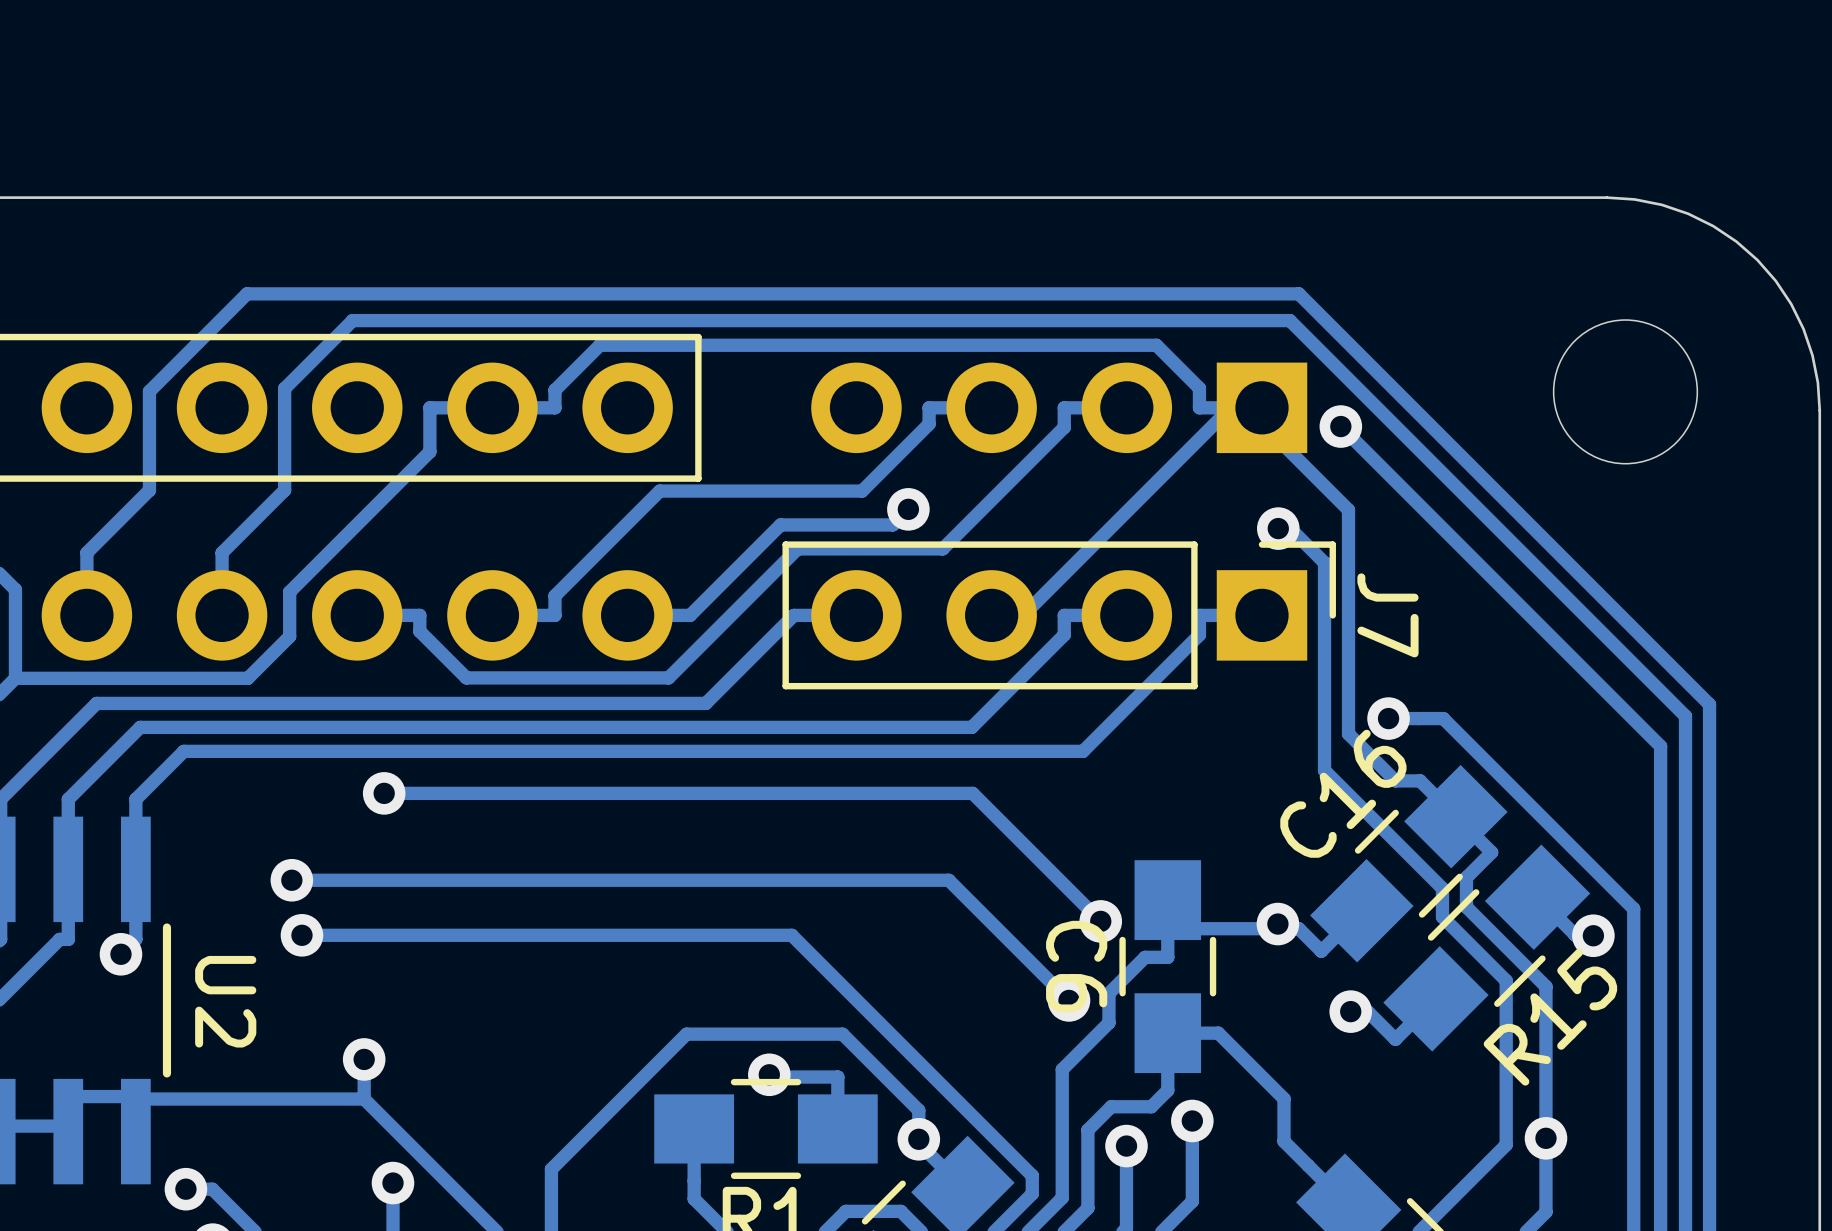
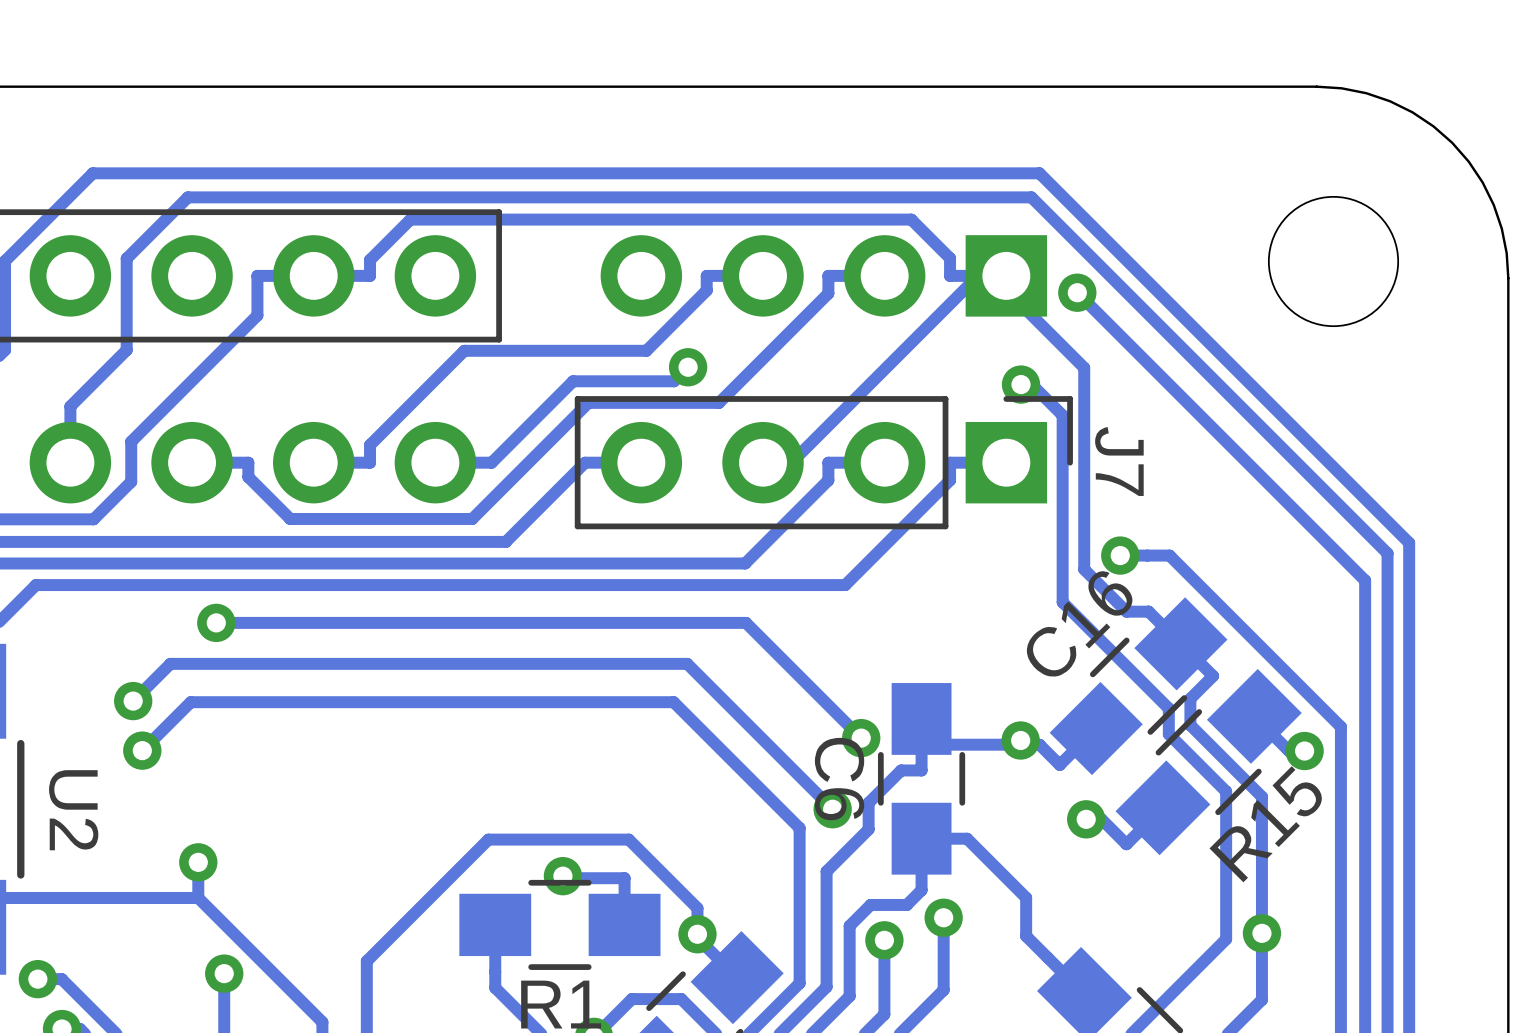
track: (948, 880) (291, 880) -> (724, 701) (687, 663) (170, 663) (133, 701)
track: (301, 935) (791, 935) (1032, 1175) -> (142, 750) (190, 702) (673, 702) (799, 828) (799, 967)

